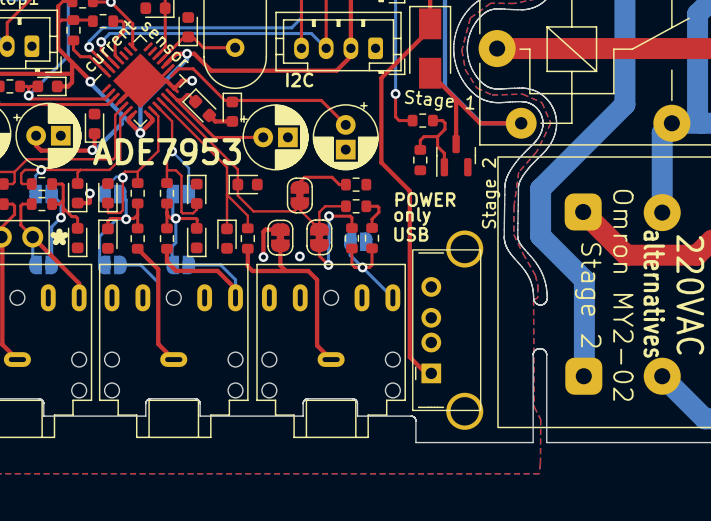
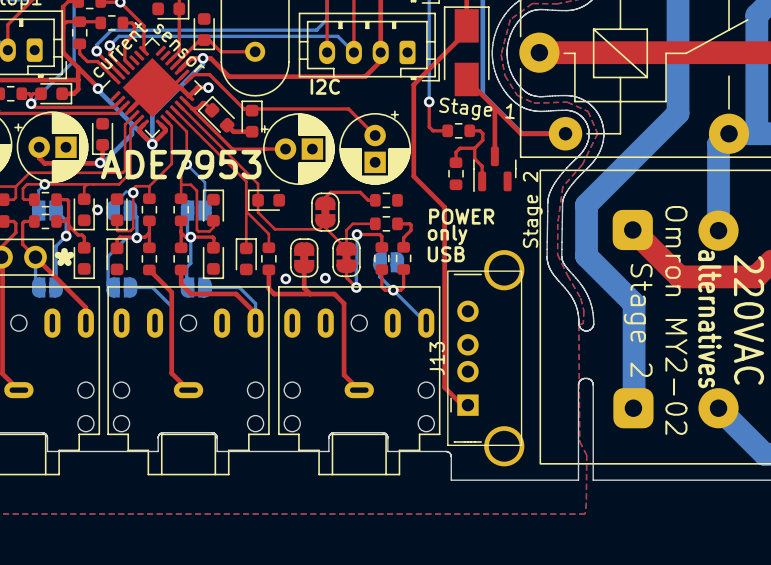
top track: (89, 193) (88, 203) (77, 203) -> none
top track: (280, 229) (265, 229) (263, 231) (263, 257) -> none
J13 name: none -> J13 (437, 358)

